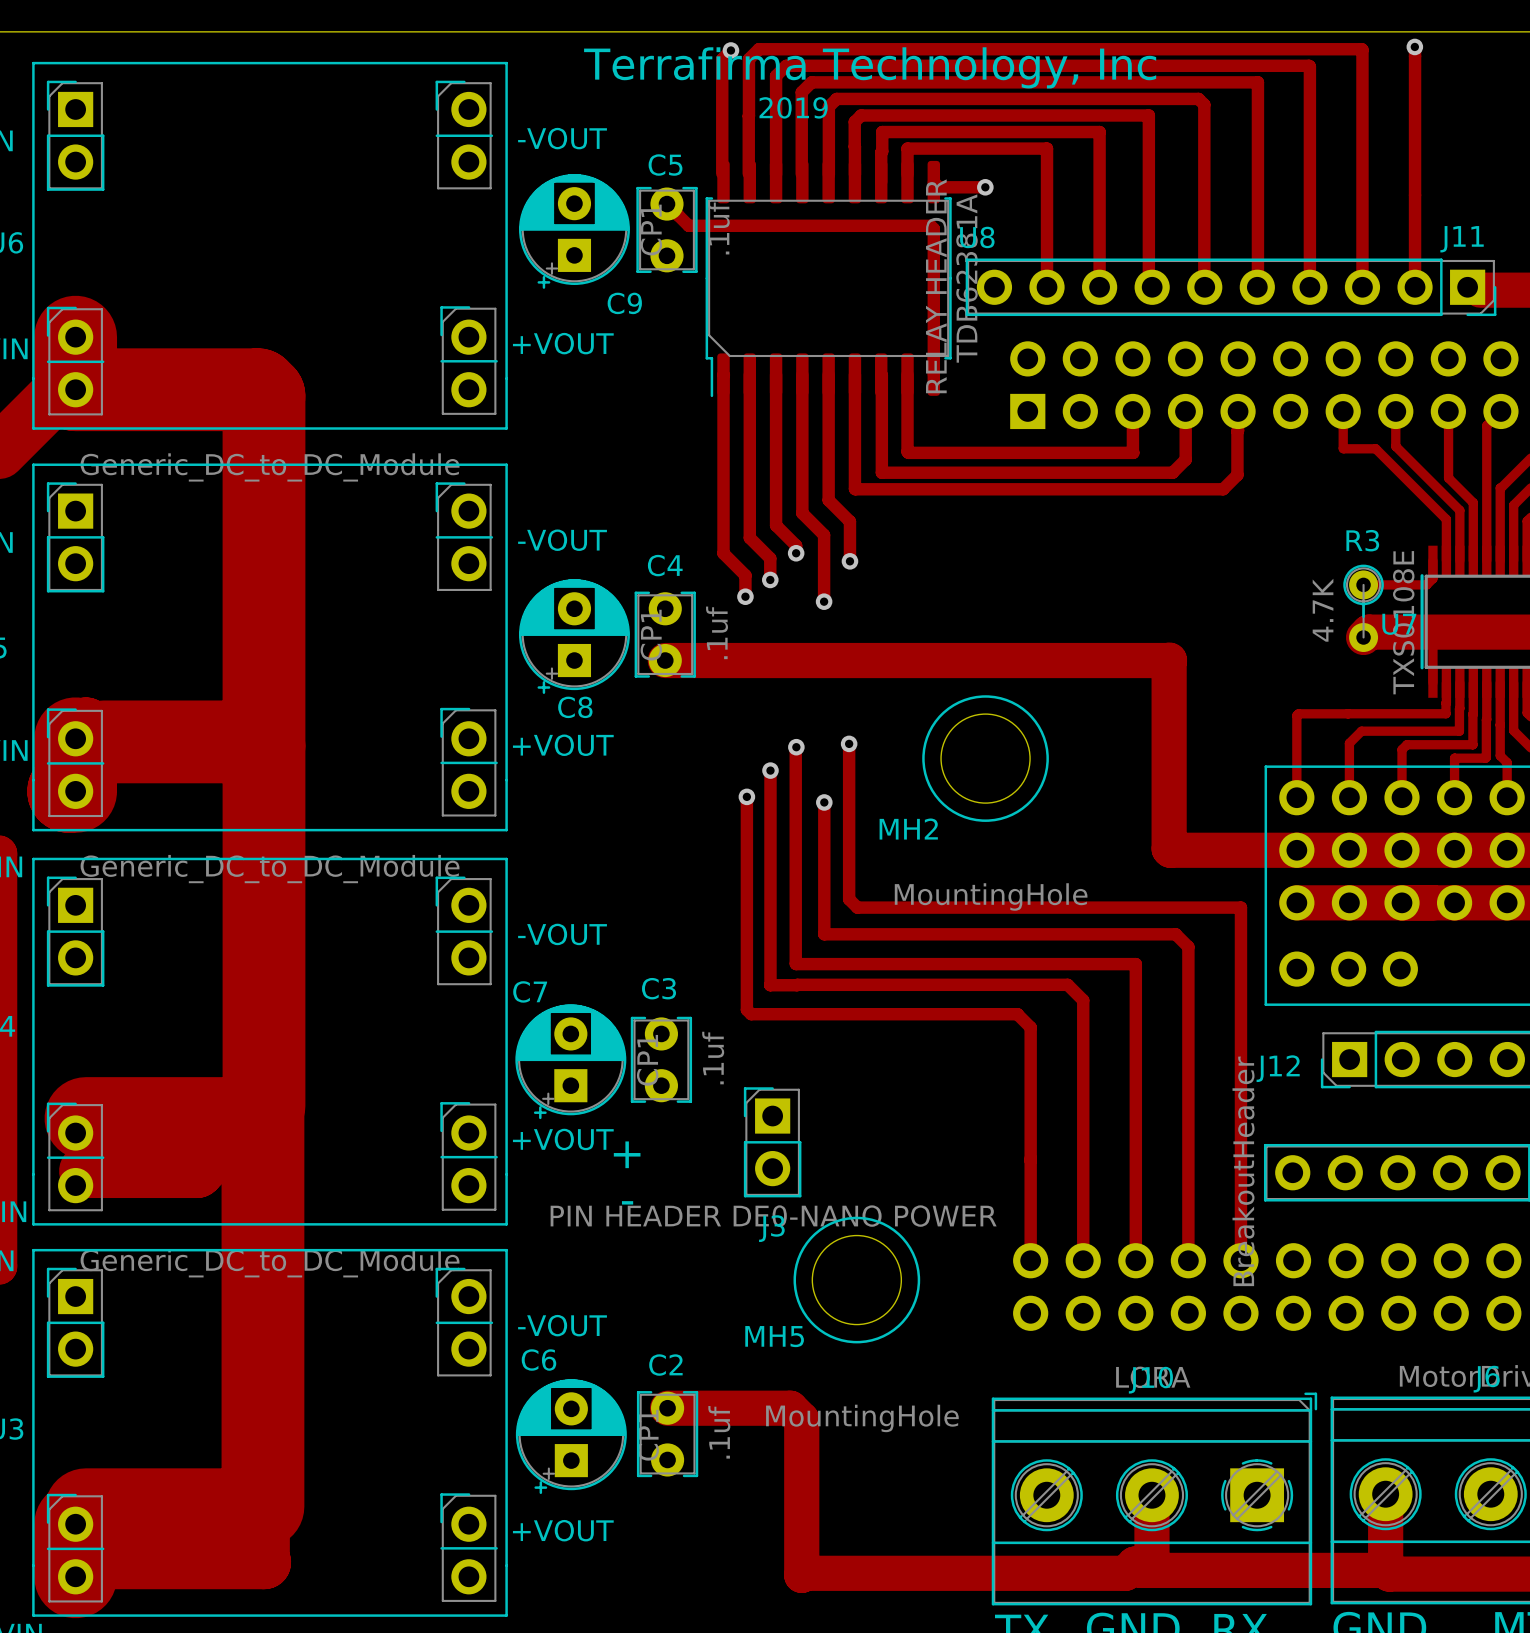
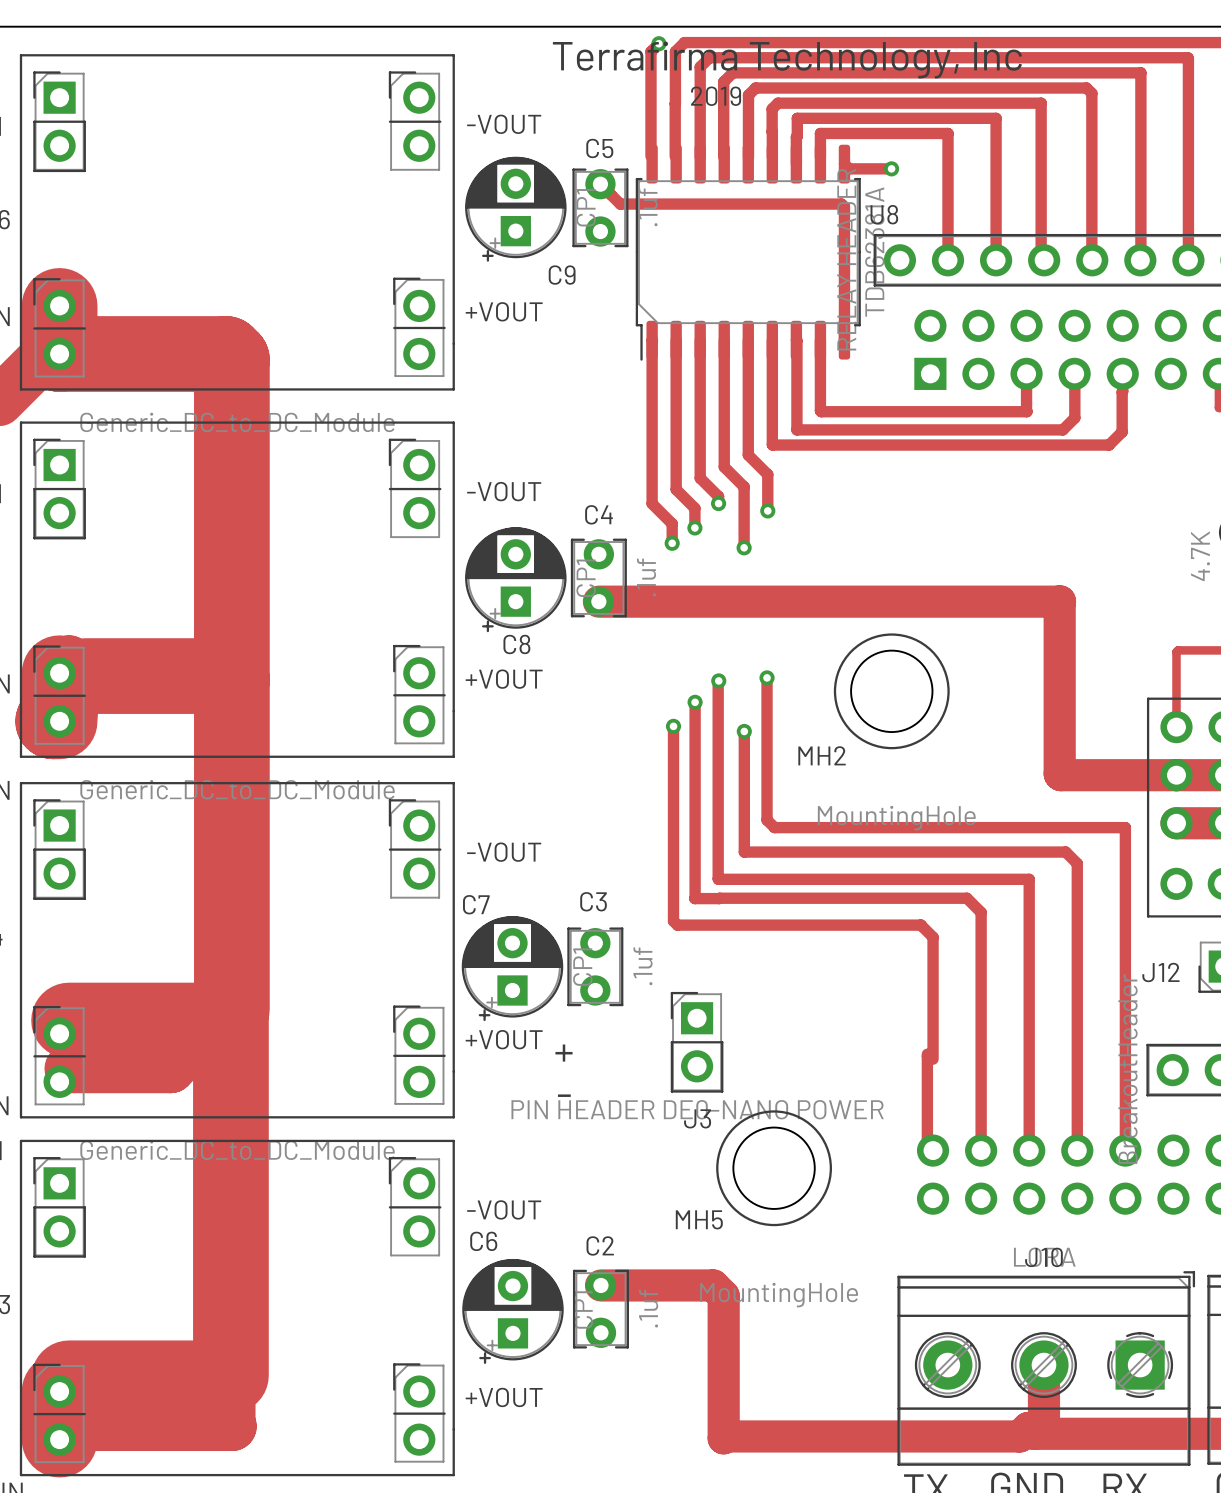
track: none -> (927, 1054) (927, 1147)
track: (1030, 1160) (1030, 1260) -> none

